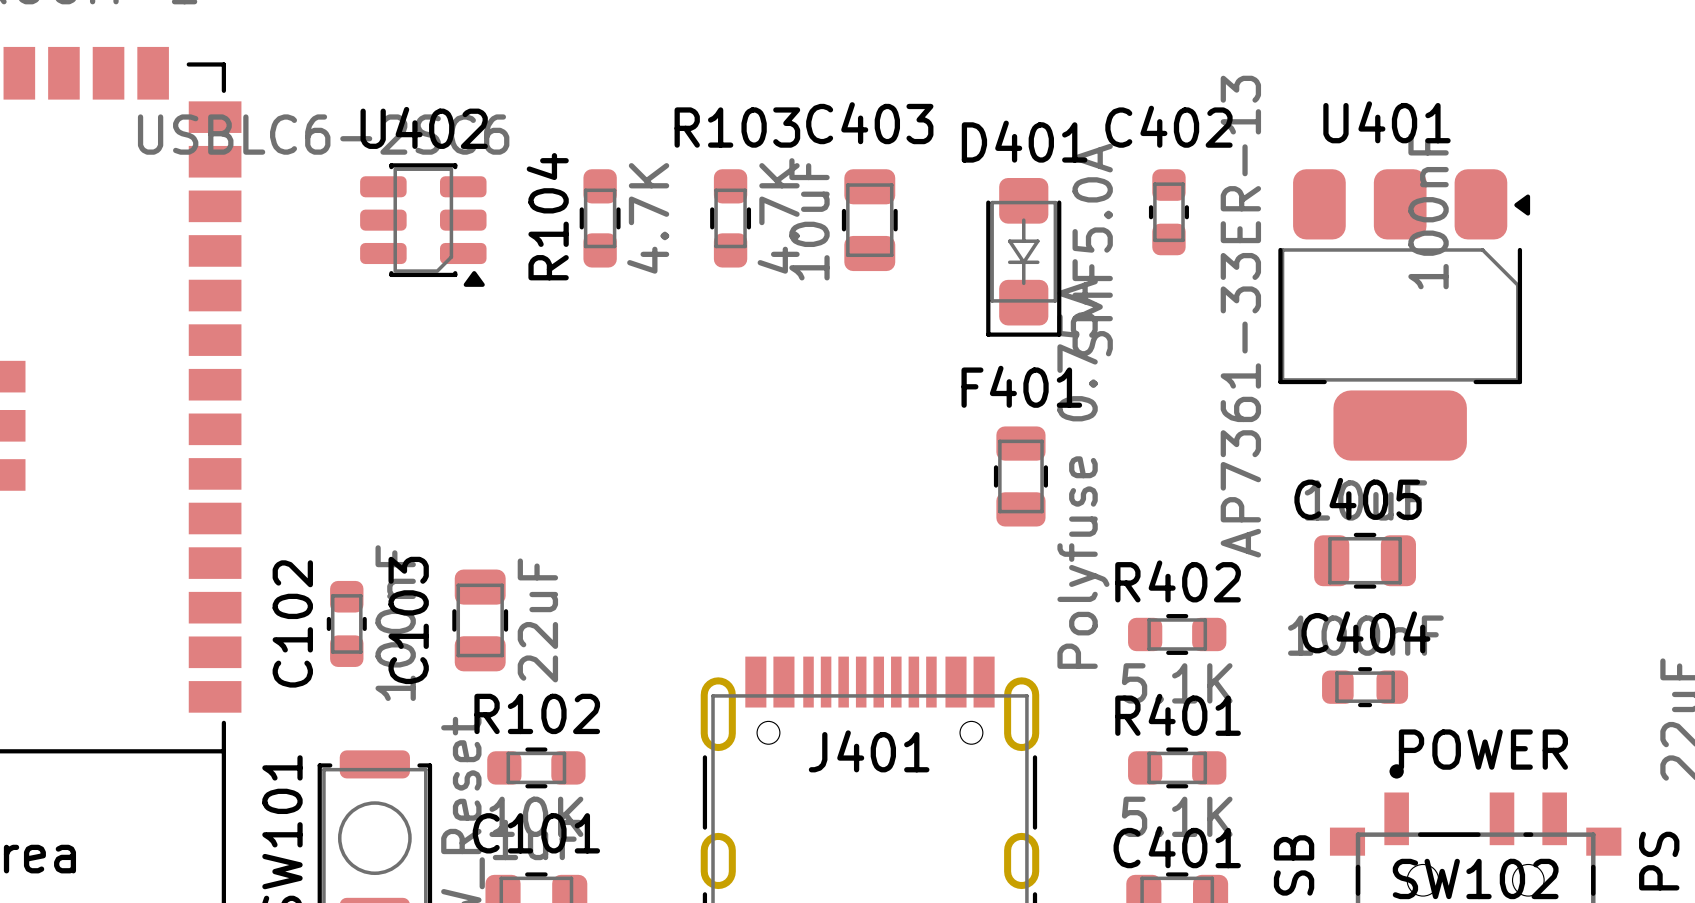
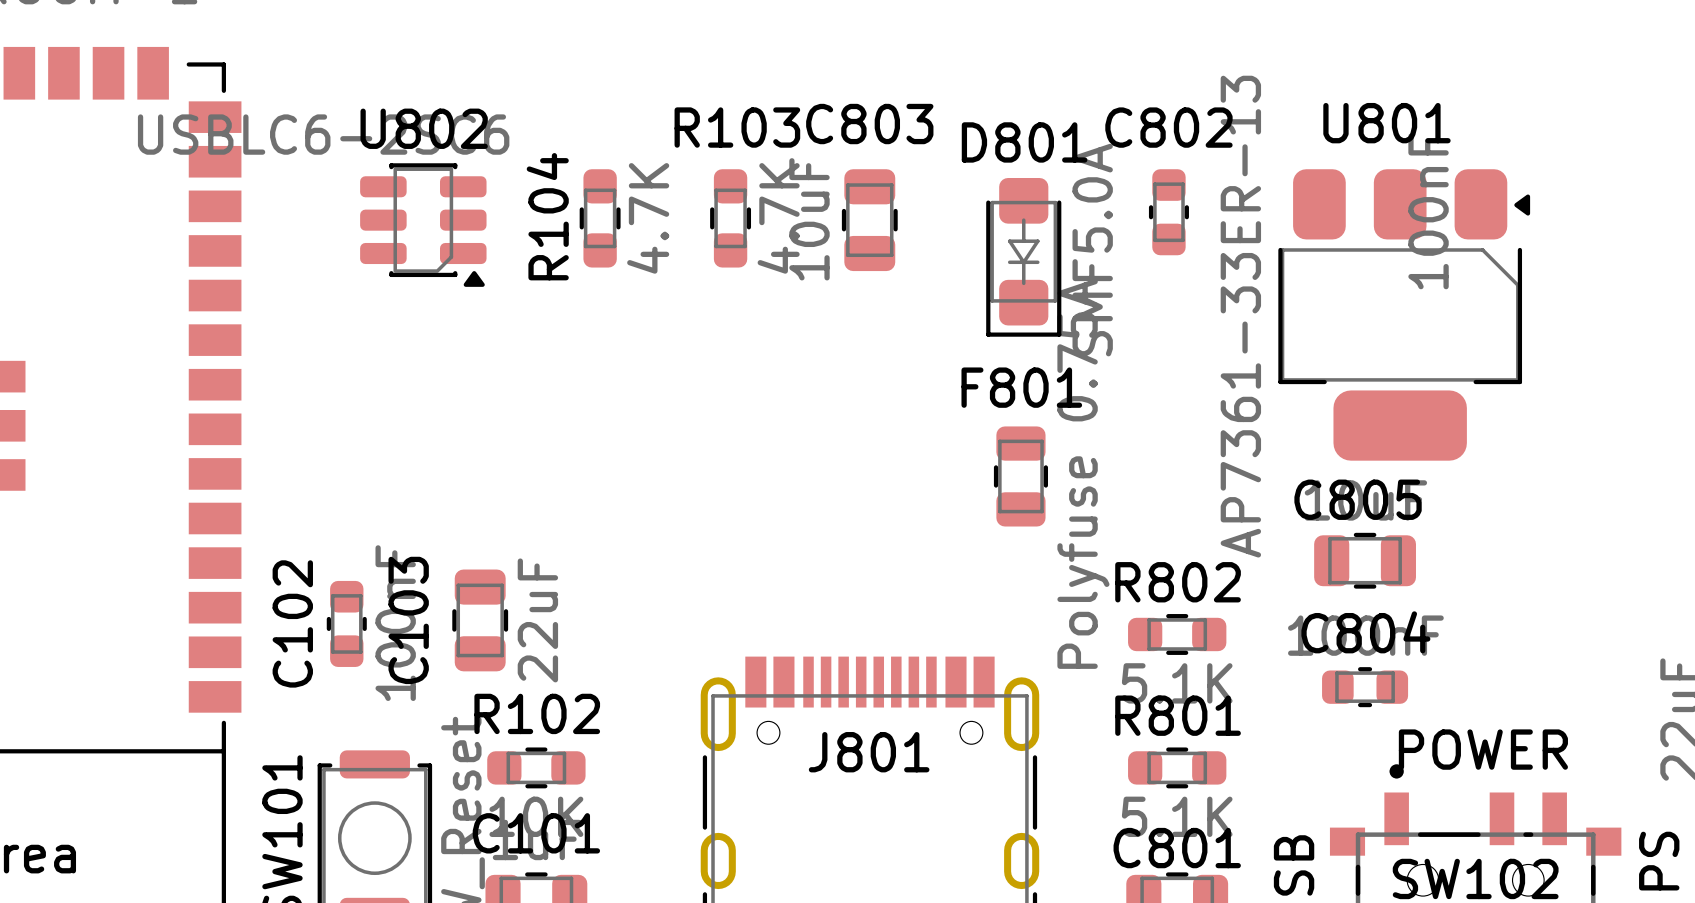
U401 name: U401 (1386, 122) -> U801 (1386, 123)
C403 name: C403 (869, 123) -> C803 (869, 124)
C402 name: C402 (1168, 126) -> C802 (1168, 127)
U402 name: U402 (424, 127) -> U802 (424, 128)
D401 name: D401 (1024, 141) -> D801 (1024, 142)
F401 name: F401 (1021, 386) -> F801 (1021, 387)
C405 name: C405 (1358, 498) -> C805 (1358, 499)
R402 name: R402 (1178, 581) -> R802 (1178, 582)
C404 name: C404 (1365, 632) -> C804 (1365, 632)
R401 name: R401 (1178, 714) -> R801 (1178, 715)
J401 name: J401 (869, 751) -> J801 (869, 752)
C401 name: C401 (1177, 847) -> C801 (1177, 848)

